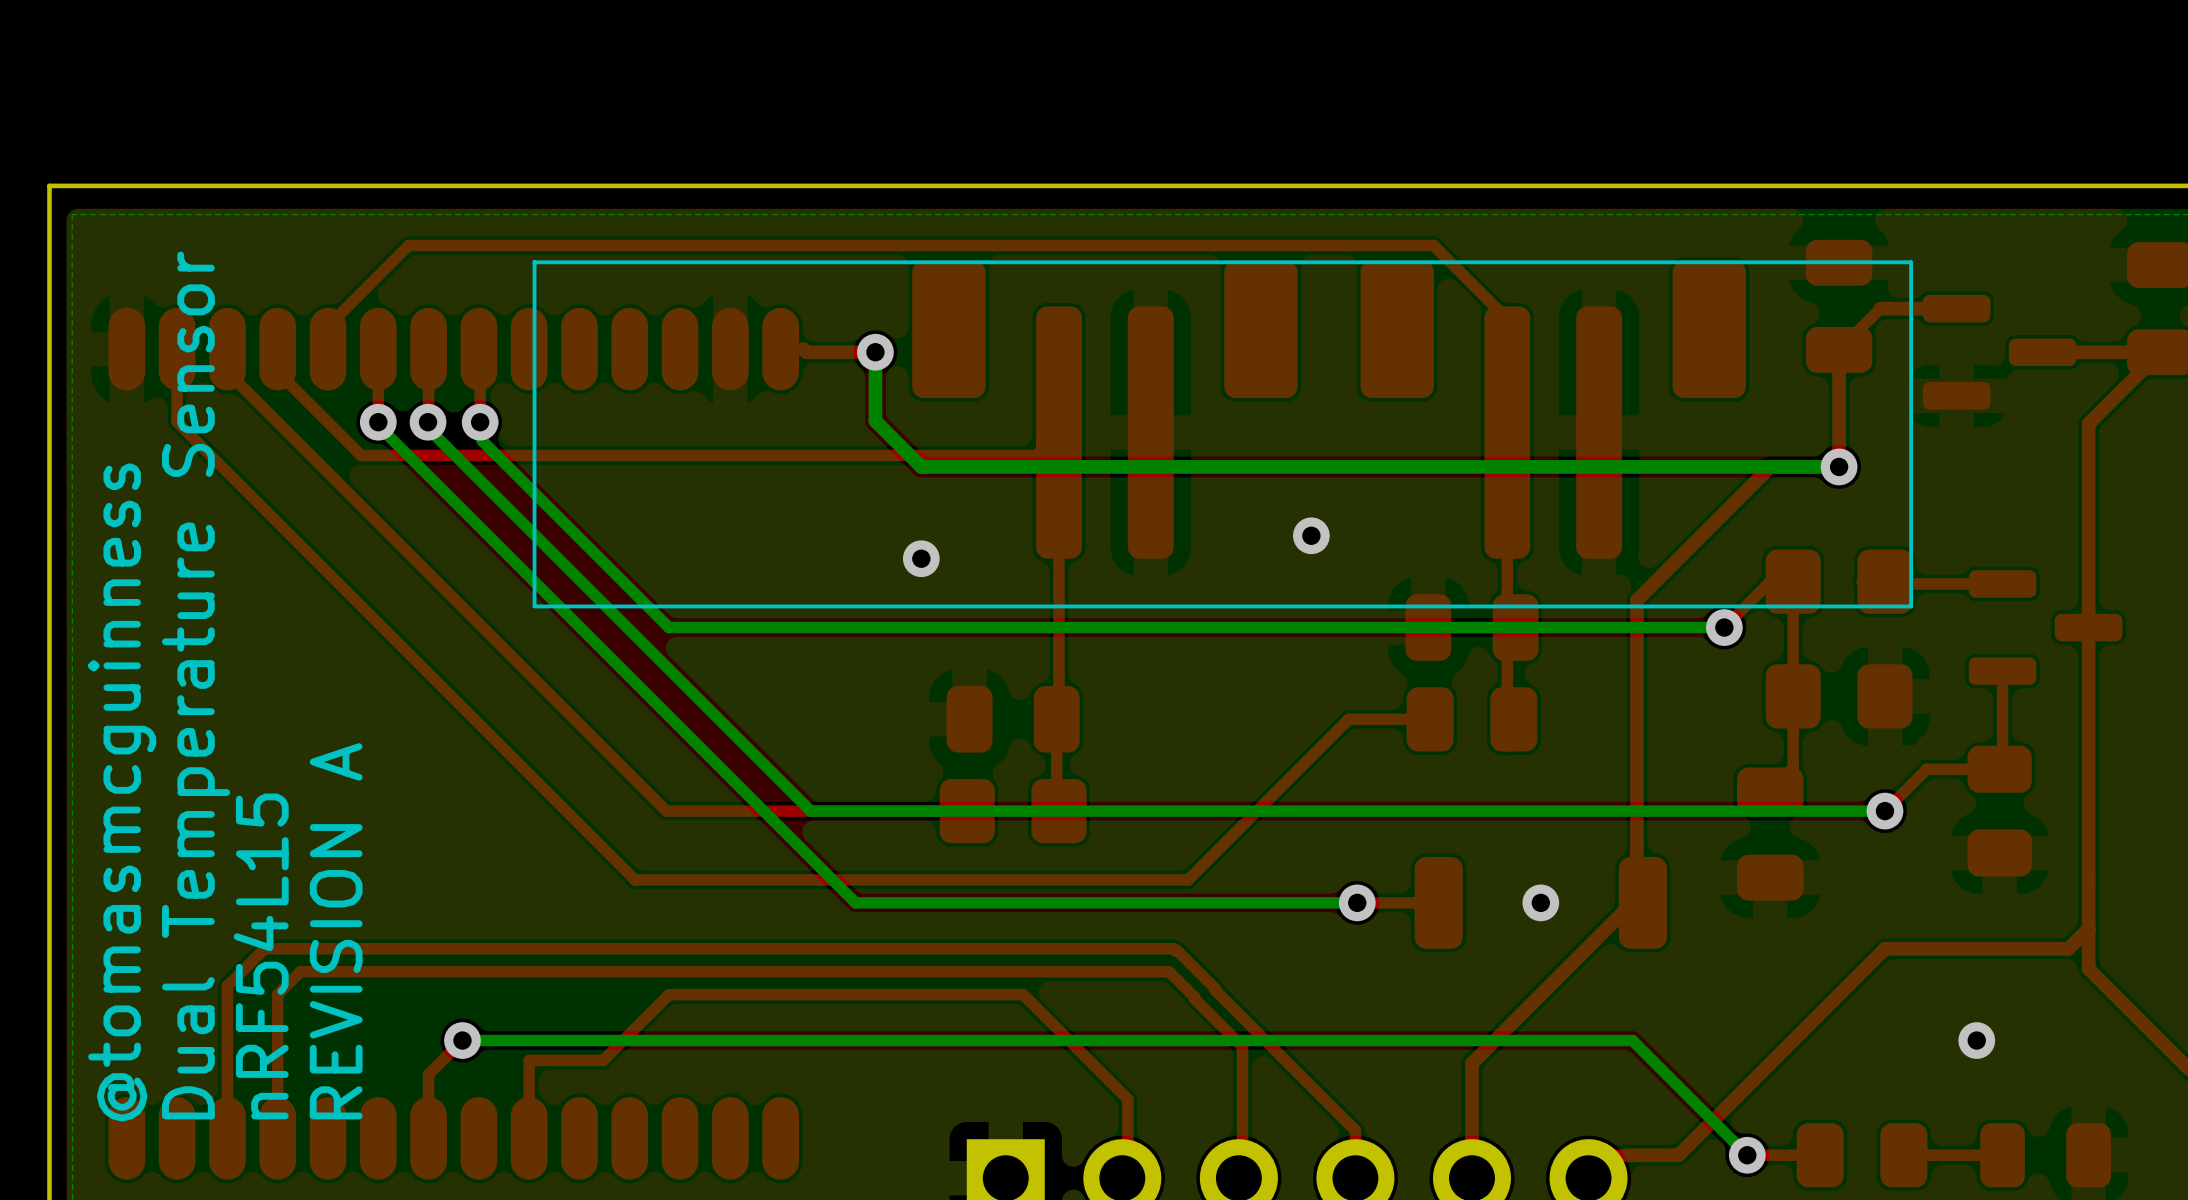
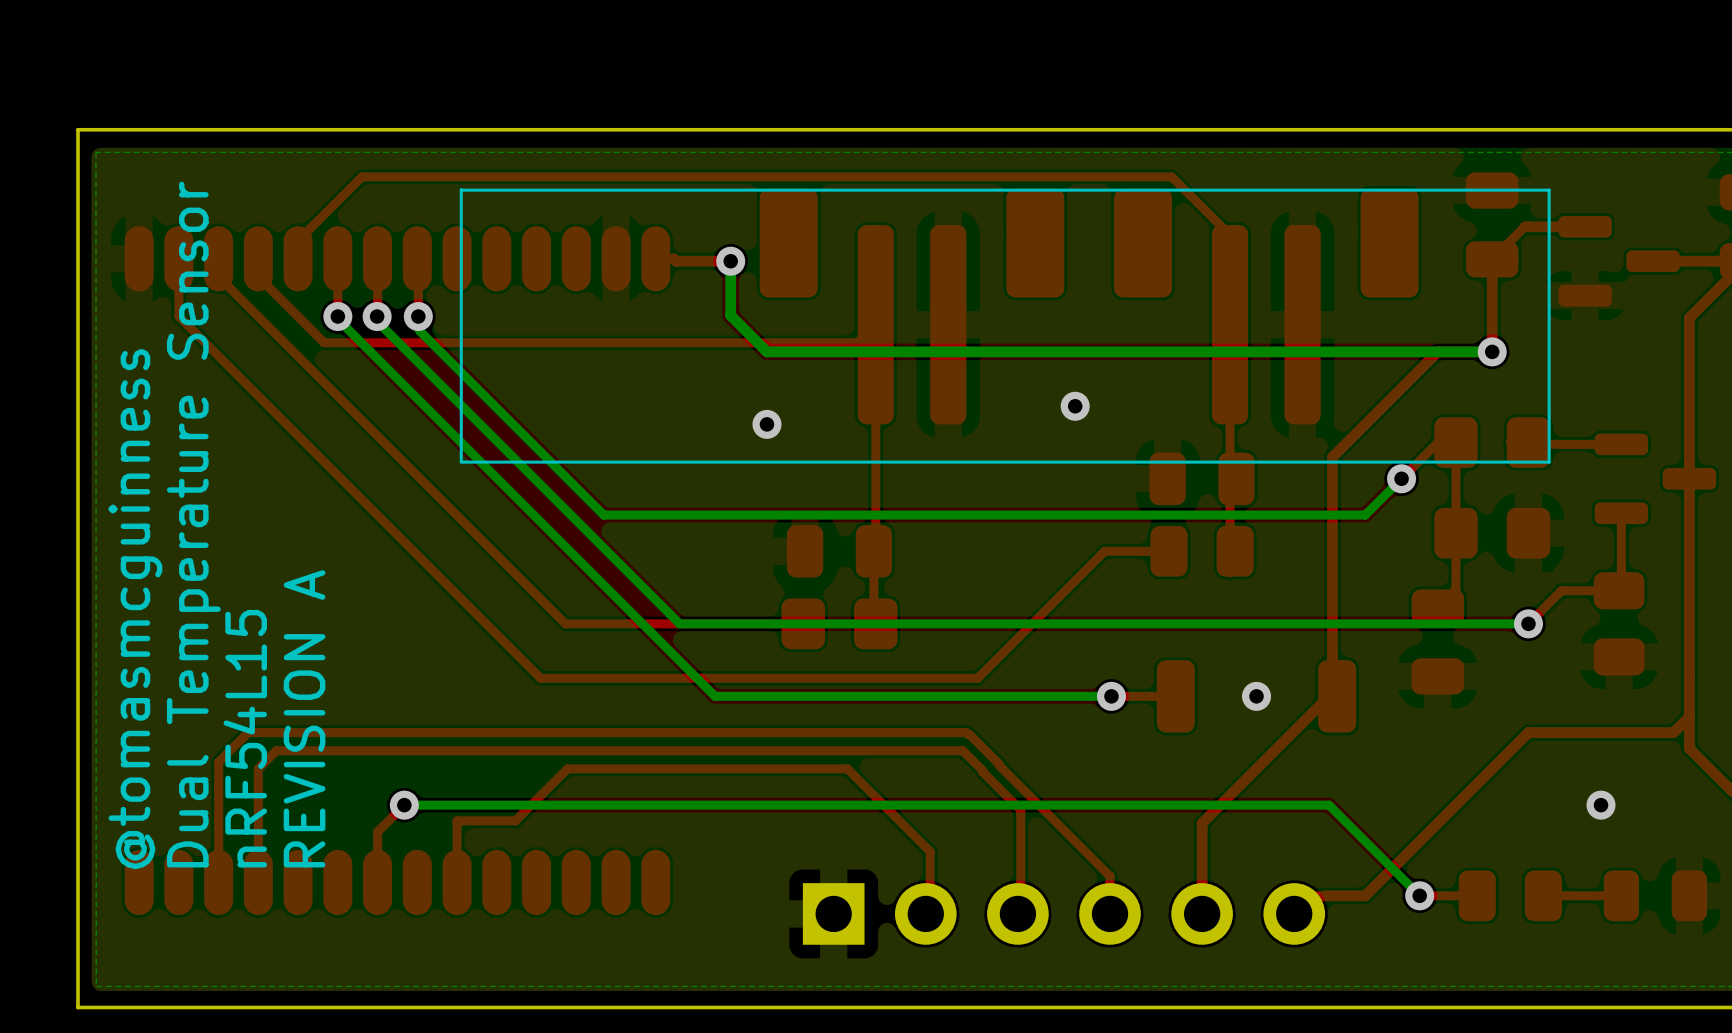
bottom track: (1724, 627) (668, 627) -> (1401, 478) (1365, 515) (603, 515) (567, 478)

